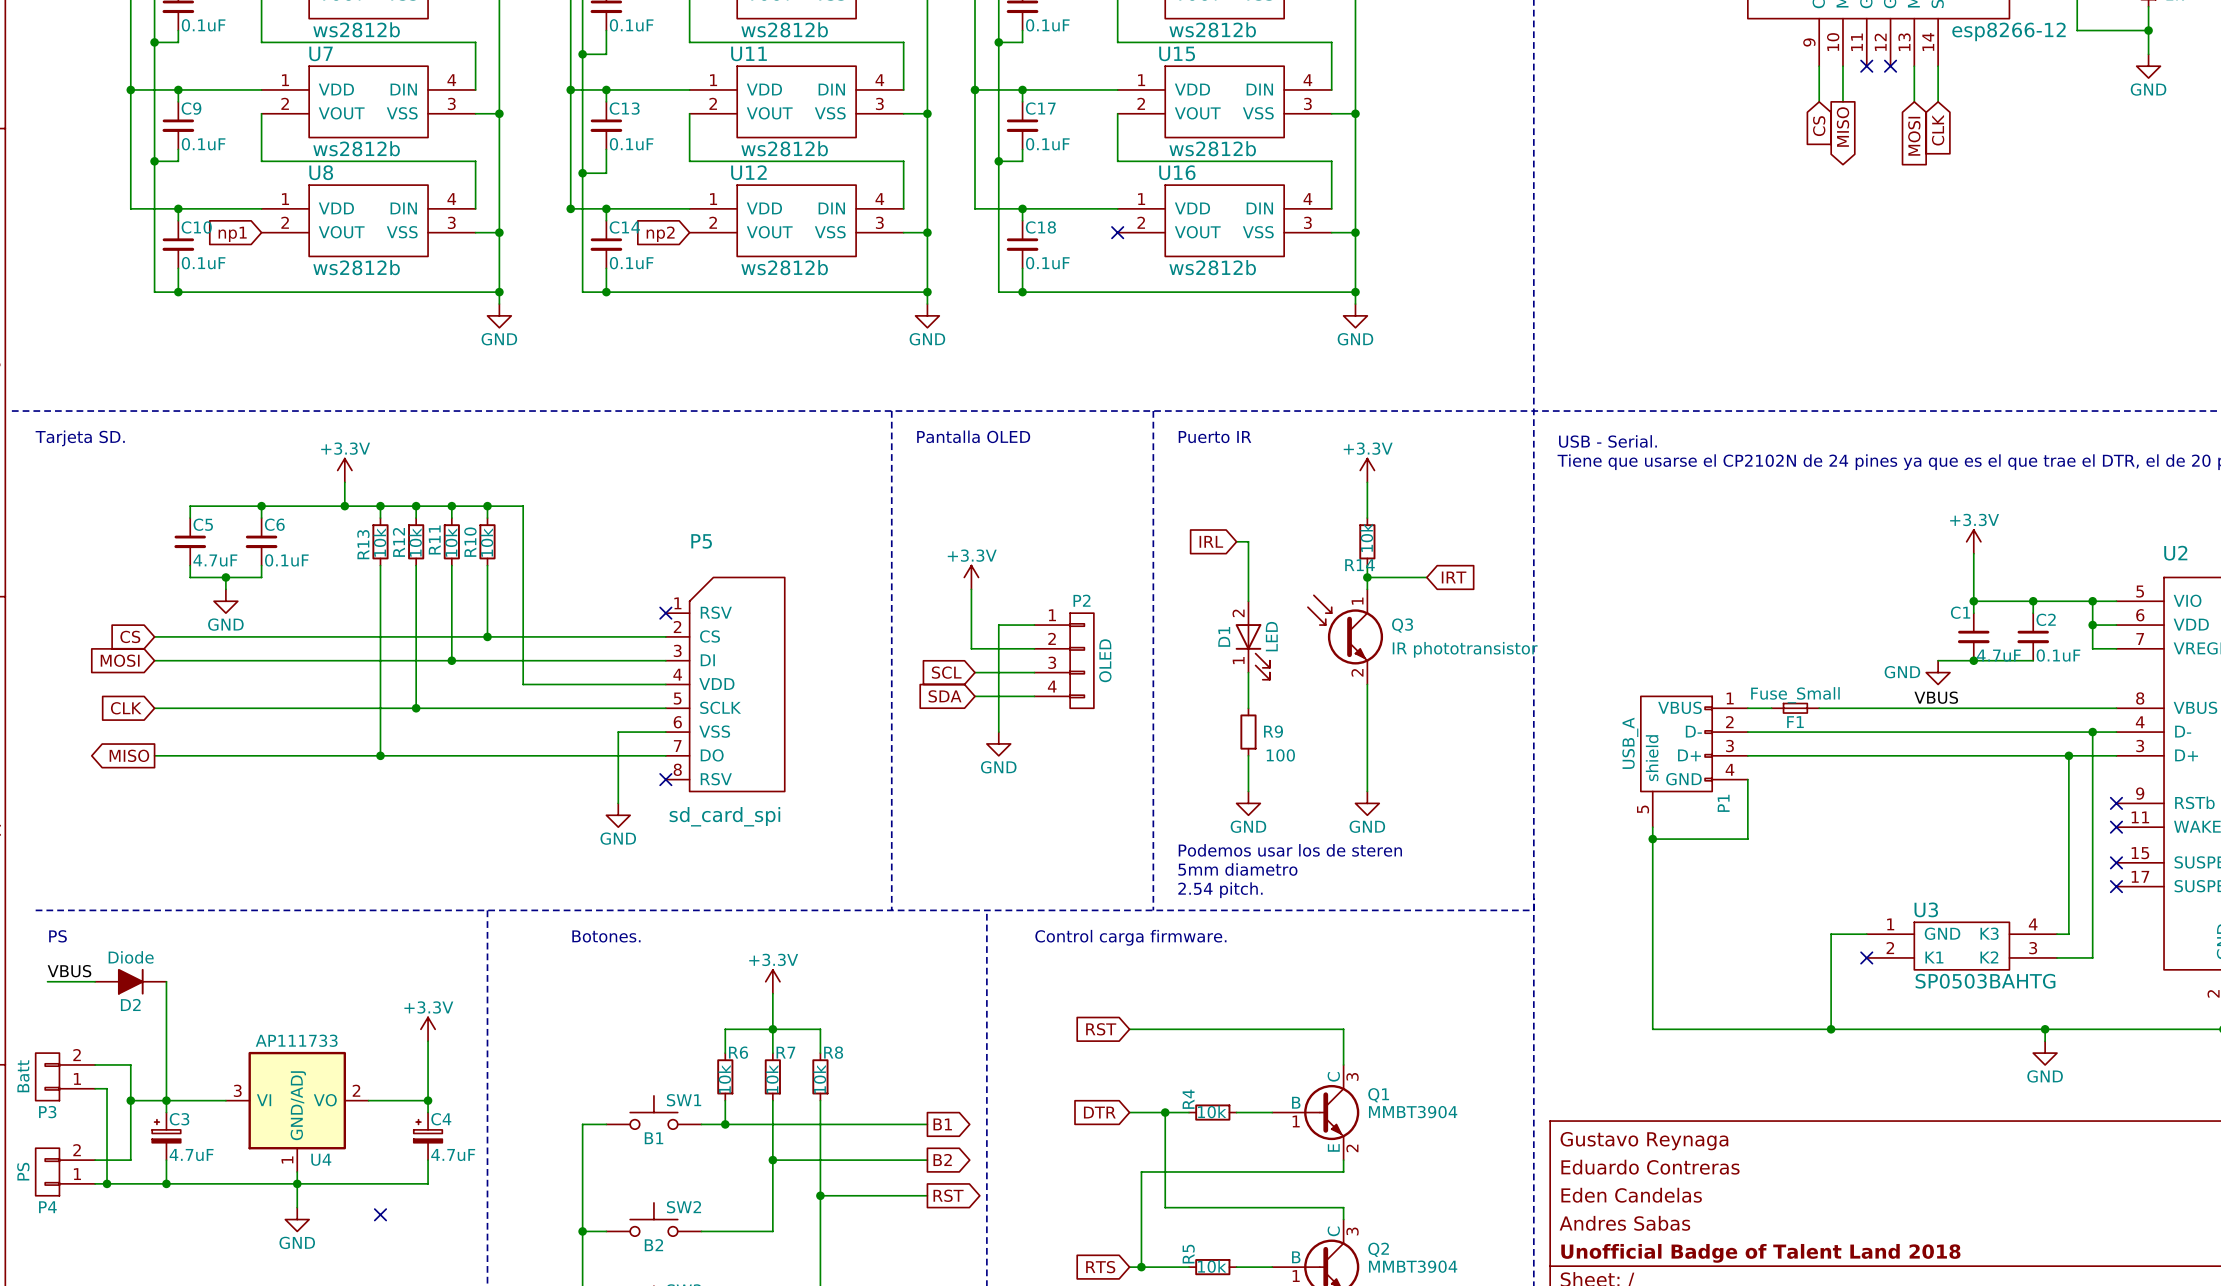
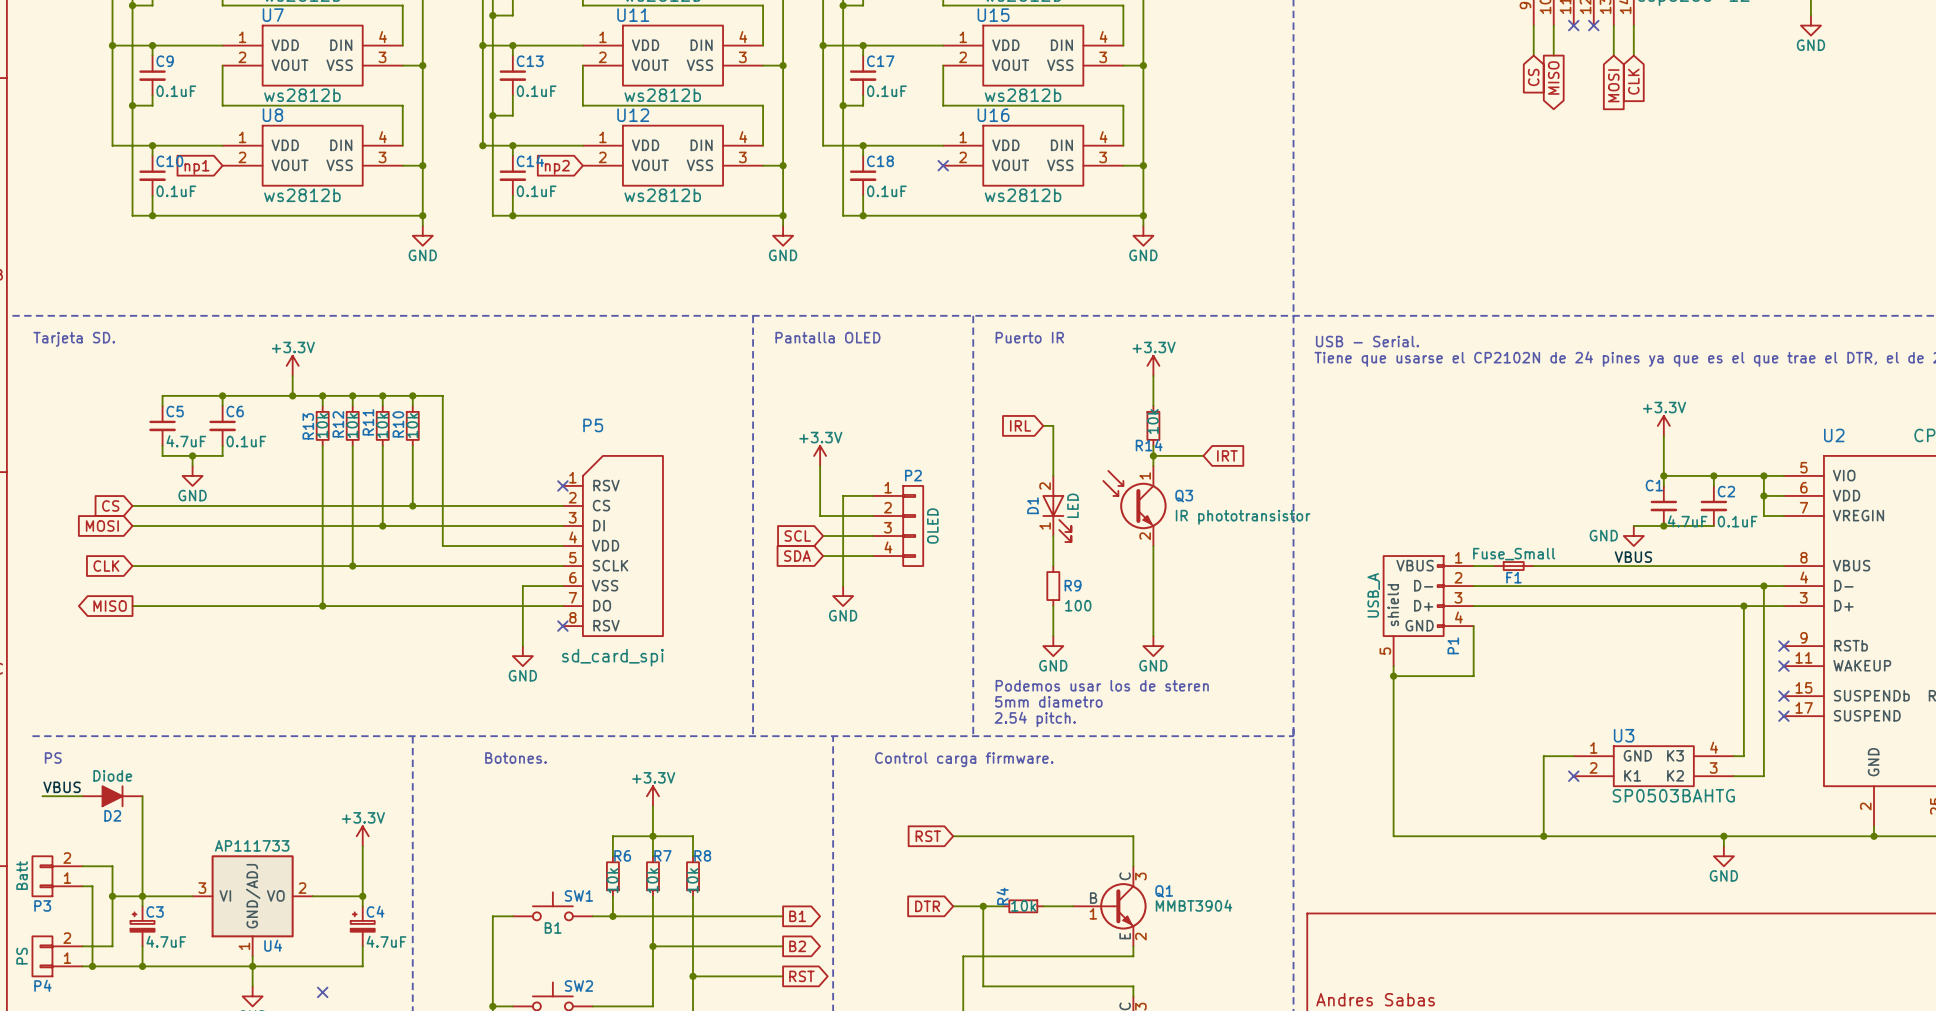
title block: Gustavo Reynaga (1644, 1141) -> none
title block: Eduardo Contreras (1650, 1167) -> none
title block: Eden Candelas (1631, 1195) -> none

